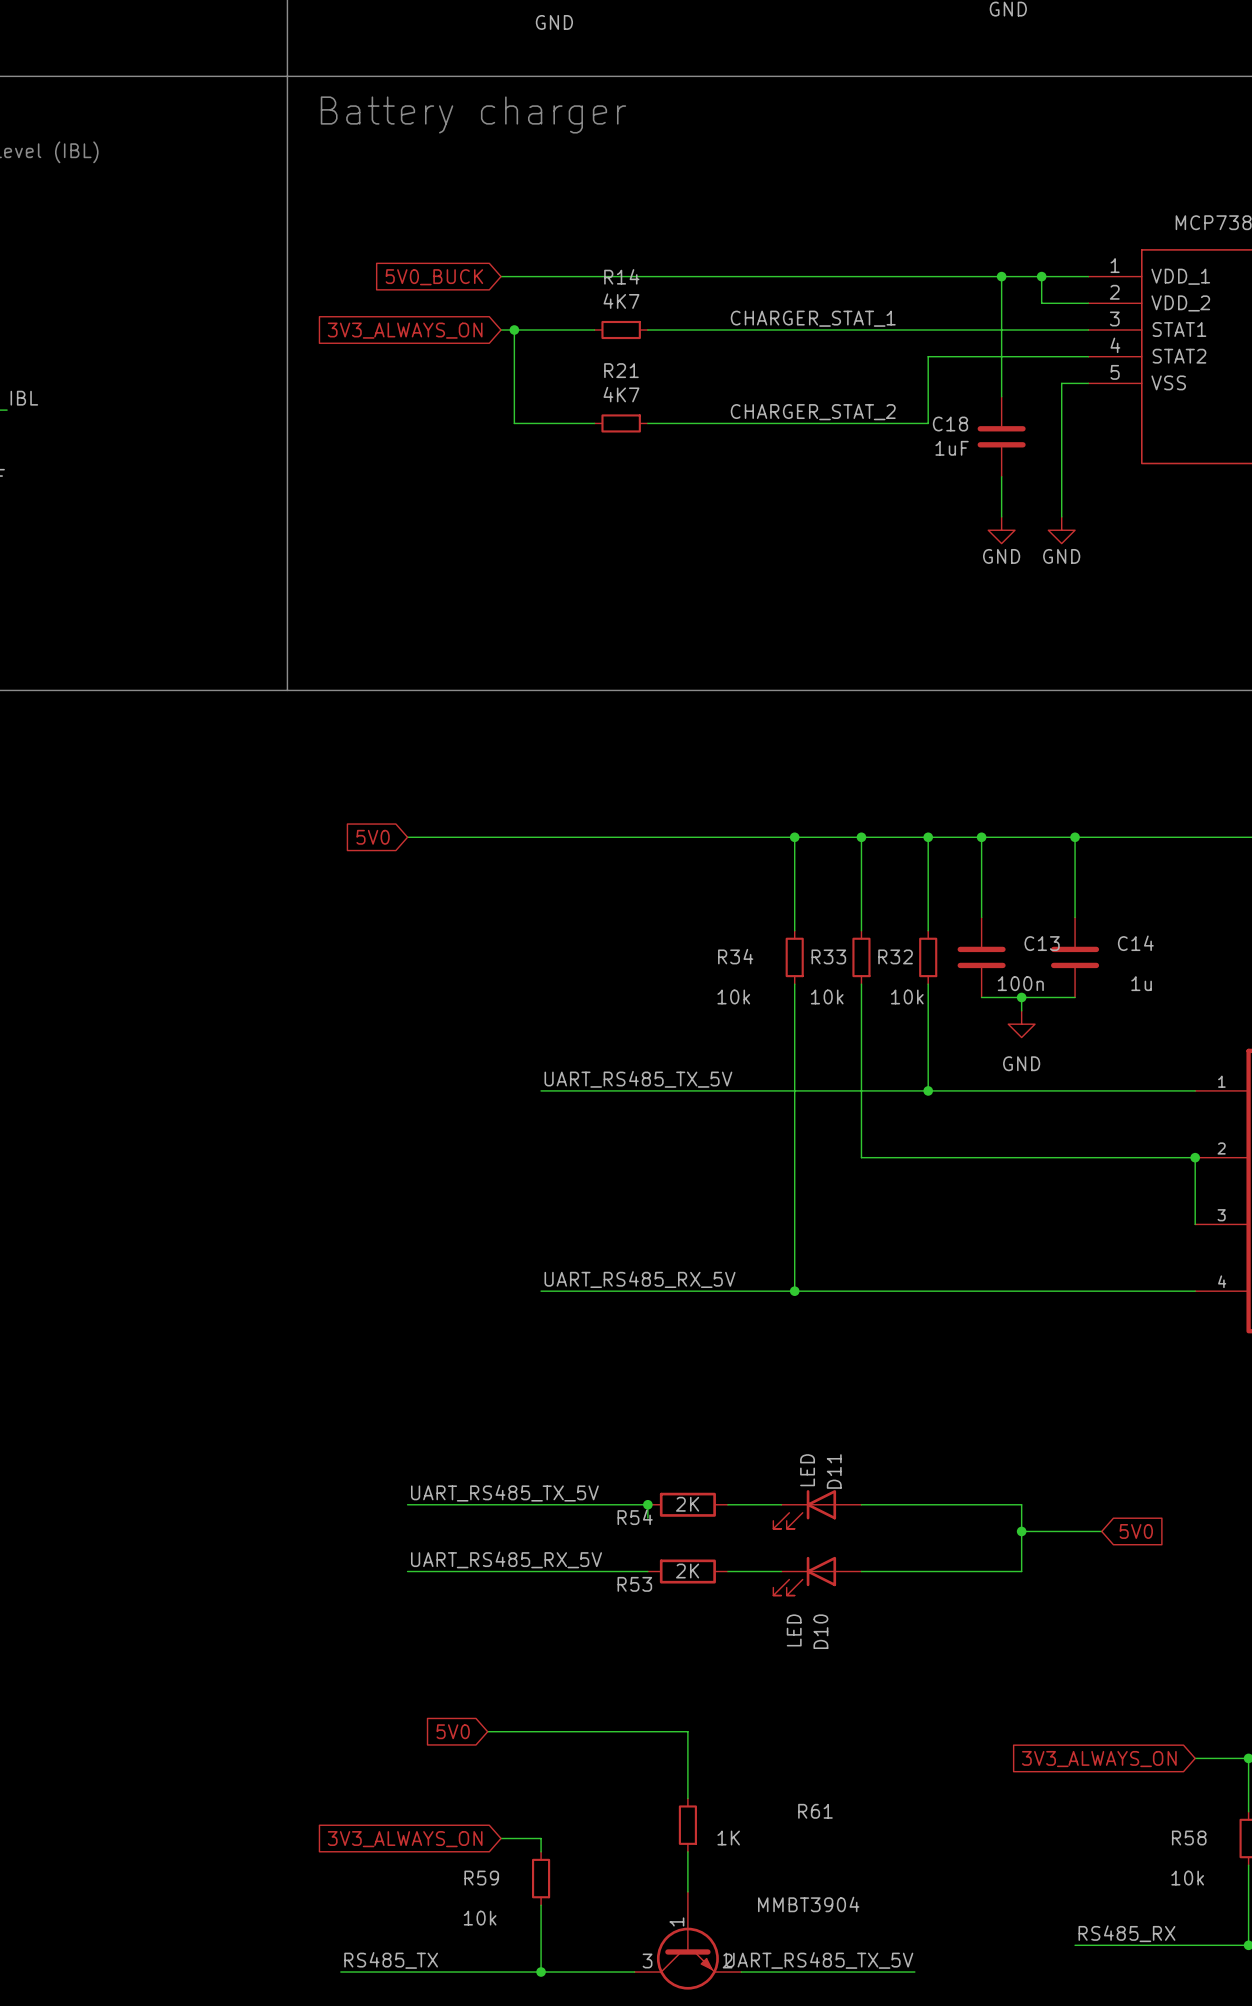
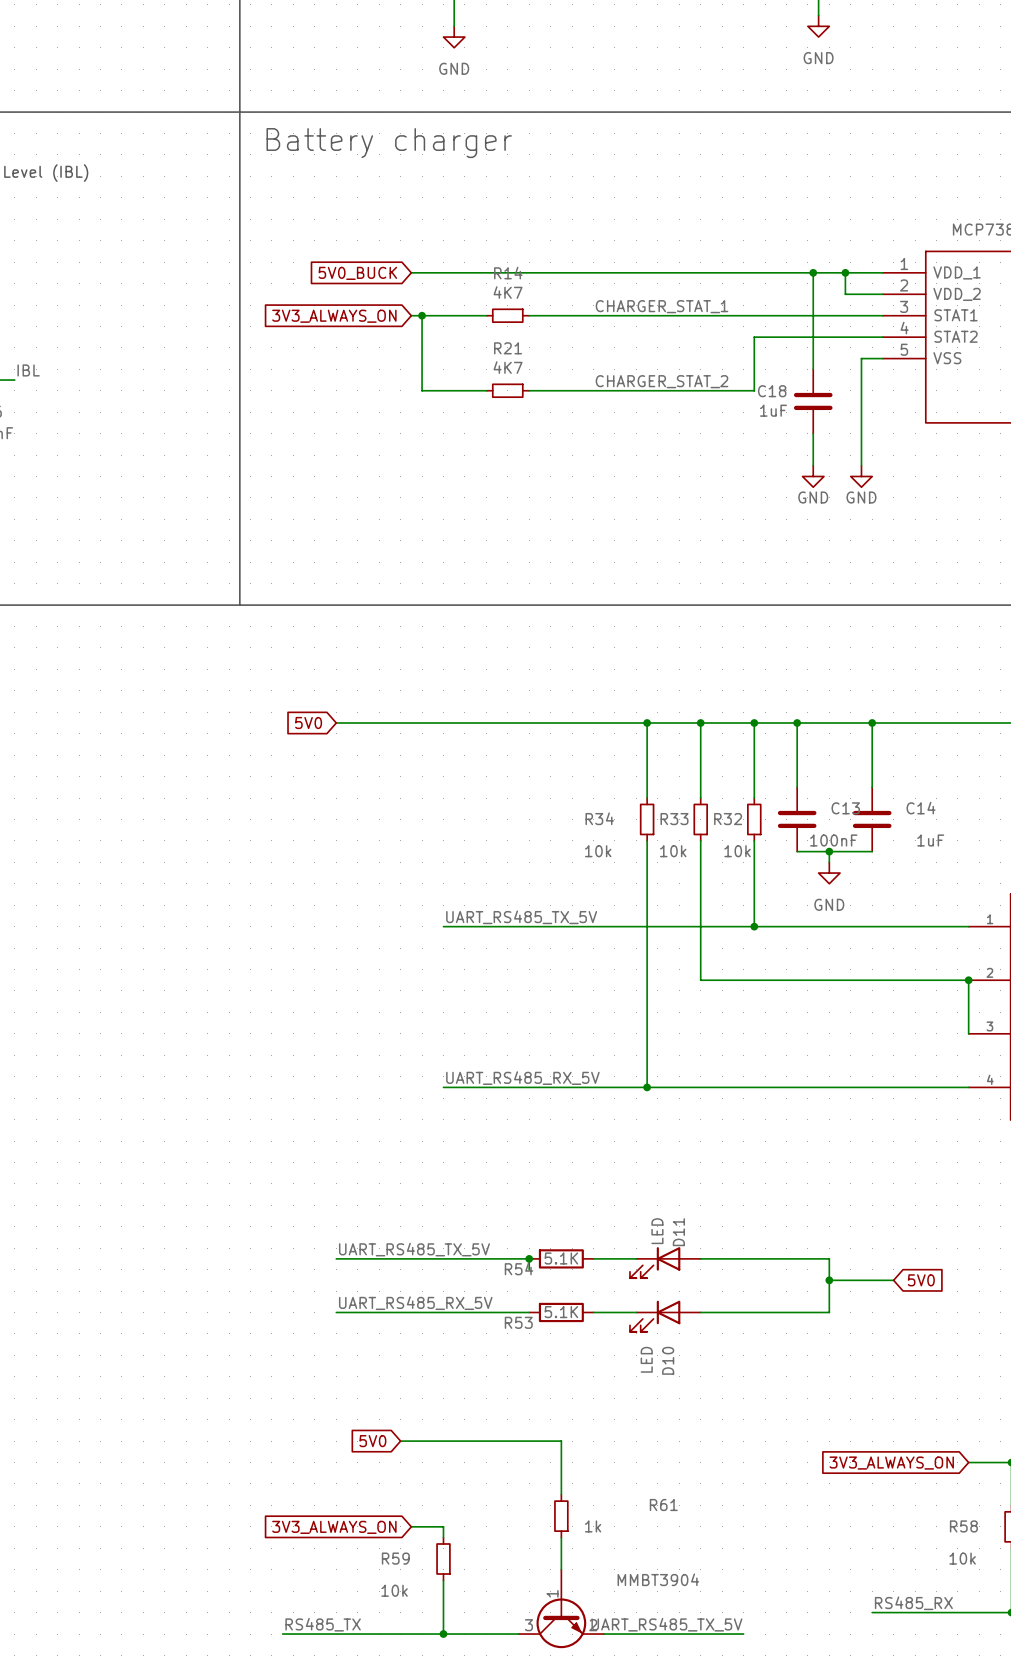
C13 value: 100n (1020, 983) -> 100nF (833, 840)
C14 value: 1u (1141, 983) -> 1uF (930, 840)
R54 value: 2K (687, 1504) -> 5.1K (561, 1258)
R53 value: 2K (687, 1571) -> 5.1K (561, 1312)
R61 value: 1K (728, 1838) -> 1k (593, 1526)

